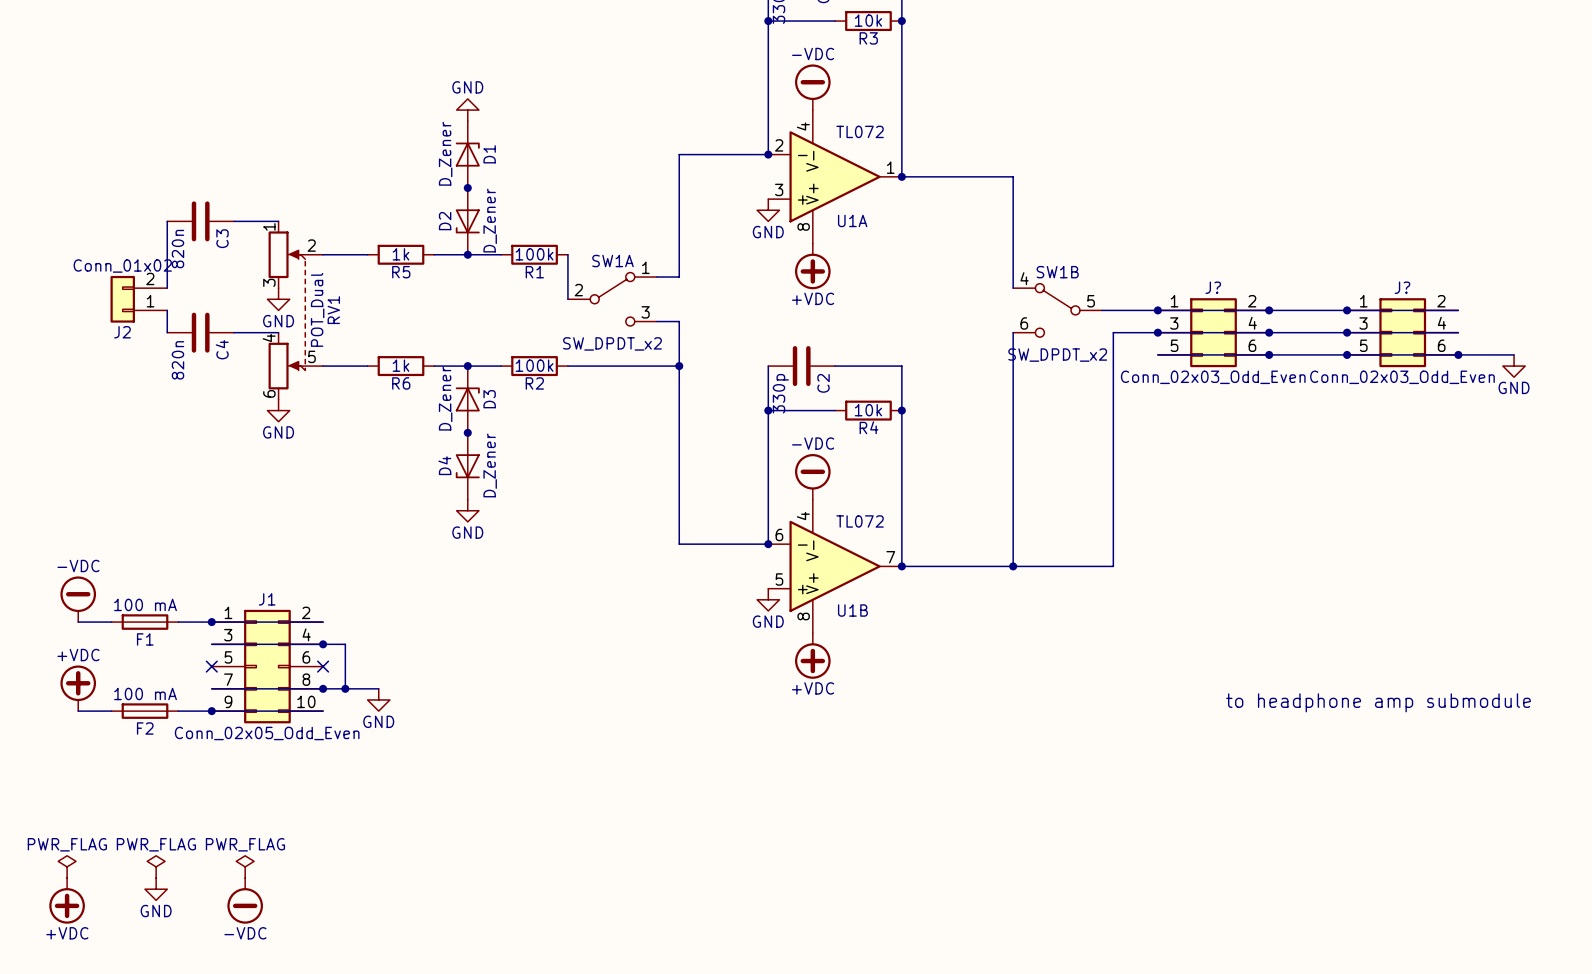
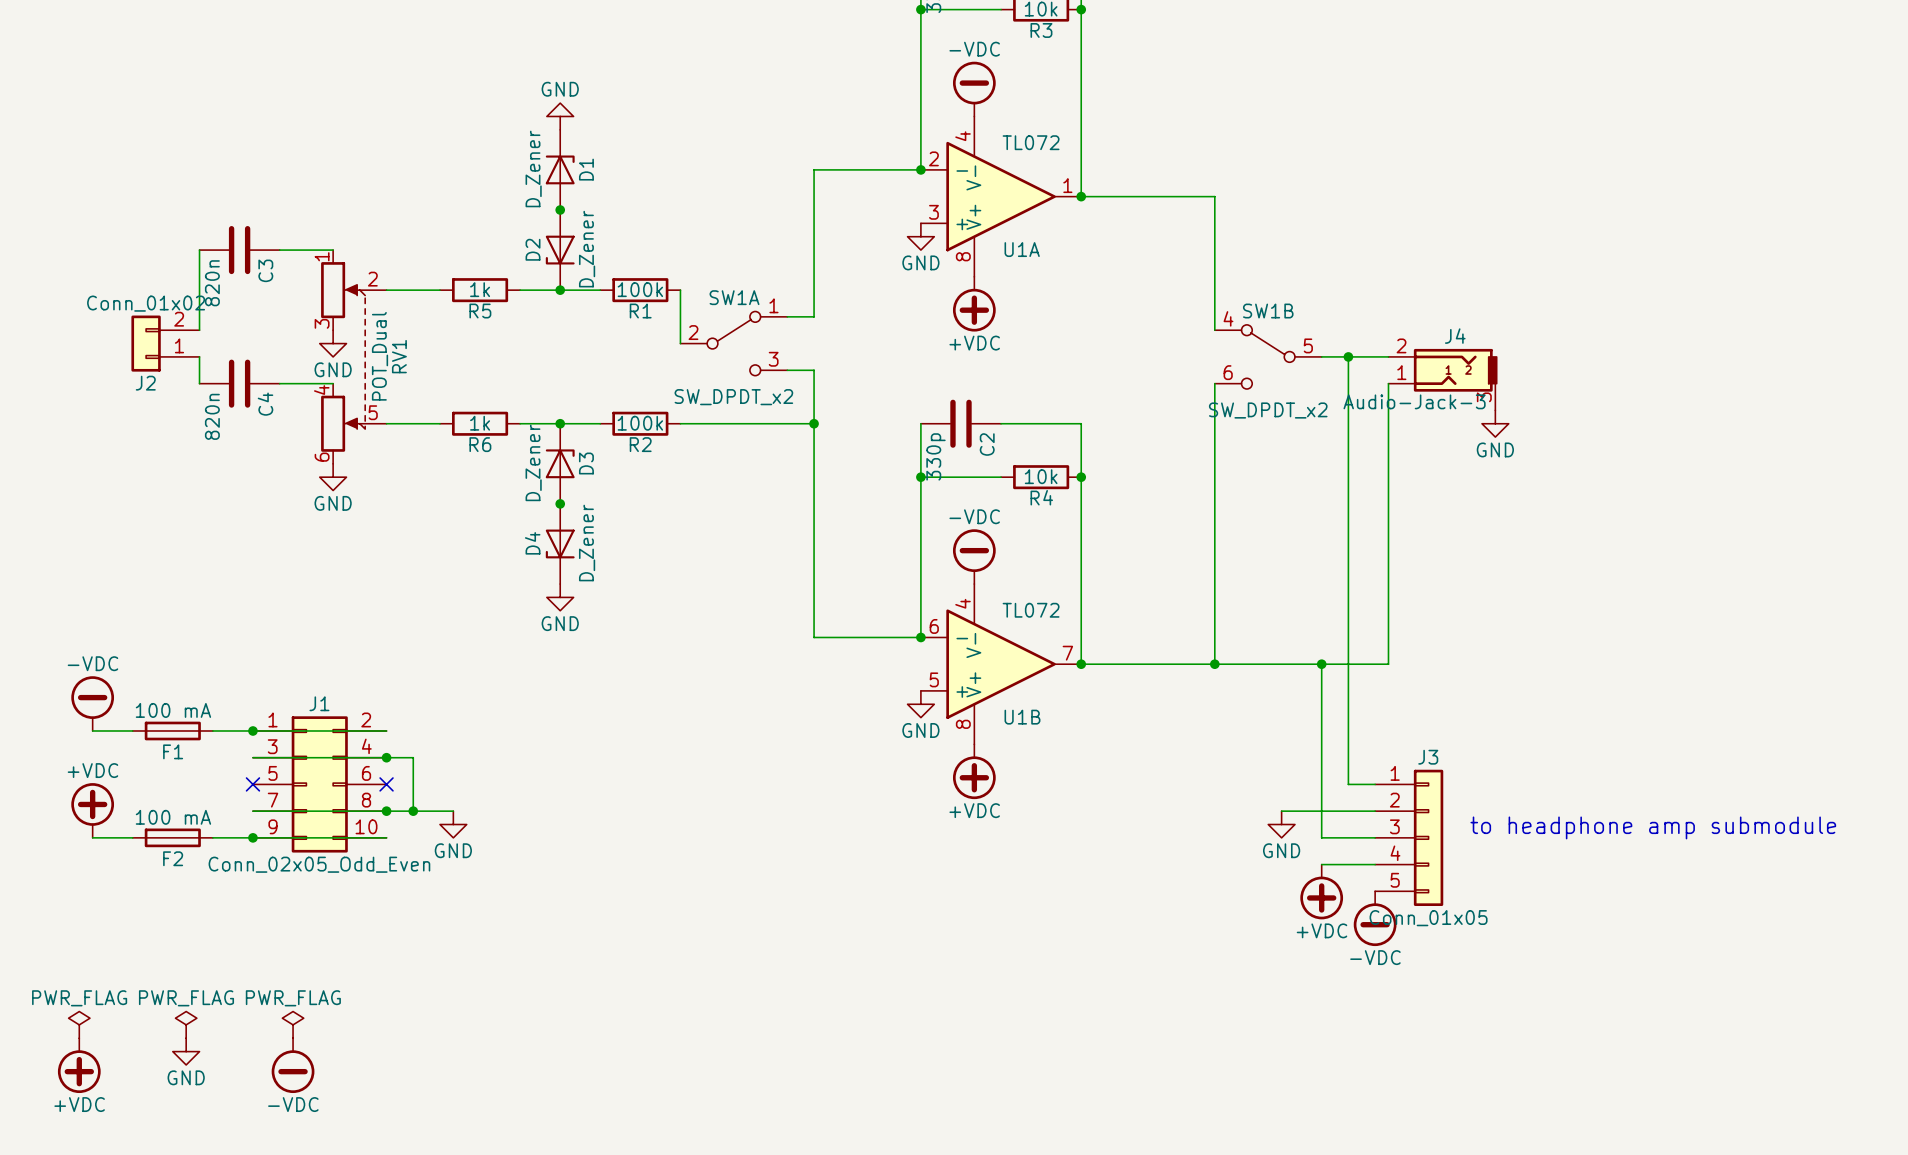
wire: none -> (1348, 356) (1348, 784) (1375, 784)
junction: none -> (1348, 356)
wire: (1157, 310) (1458, 310) -> none
junction: (1157, 310) -> none
junction: (1269, 310) -> none
junction: (1347, 310) -> none
J4: none -> Audio-Jack-3 (1442, 379)
junction: (1157, 332) -> none
J?: Conn_02x03_Odd_Even (1213, 332) -> none
junction: (1269, 332) -> none
junction: (1347, 332) -> none
J?: Conn_02x03_Odd_Even (1402, 332) -> none
wire: (1458, 332) (1113, 332) (1113, 566) -> (1388, 383) (1388, 664) (1335, 664)
wire: (1157, 354) (1514, 354) -> none
junction: (1269, 354) -> none
junction: (1347, 354) -> none
junction: (1458, 354) -> none
power symbol: none -> GND (1495, 423)
power symbol: GND (1514, 366) -> none
wire: none -> (1321, 664) (1321, 837) (1375, 837)
junction: none -> (1321, 664)
wire: none -> (1281, 811) (1375, 811)
power symbol: none -> GND (1281, 824)
J3: none -> Conn_01x05 (1409, 837)
wire: none -> (1321, 864) (1375, 864)
power symbol: none -> +VDC (1321, 891)
power symbol: none -> -VDC (1375, 918)

